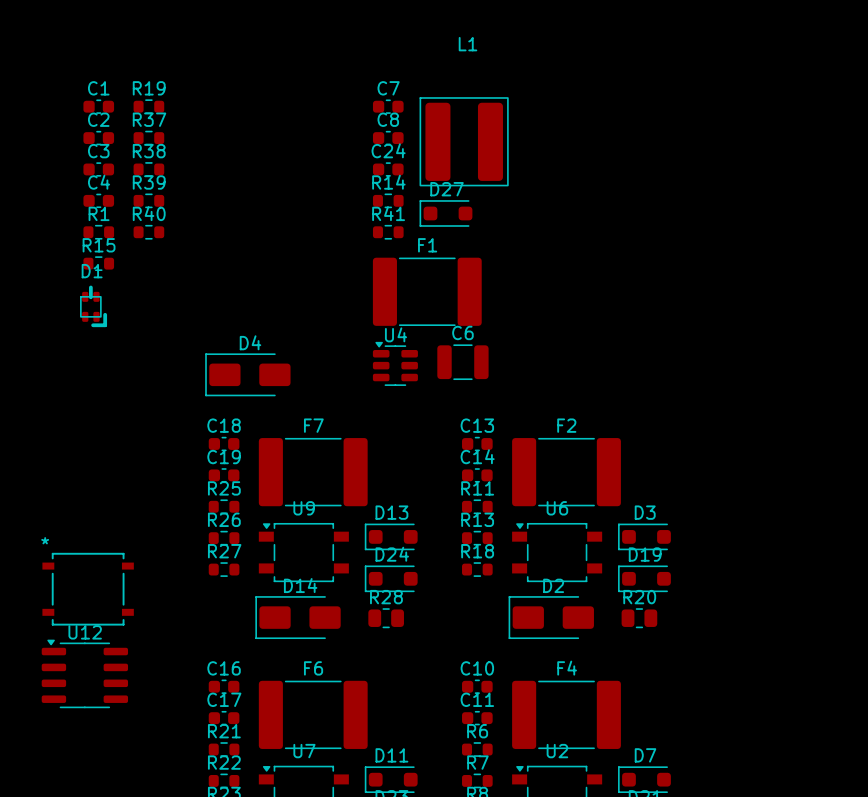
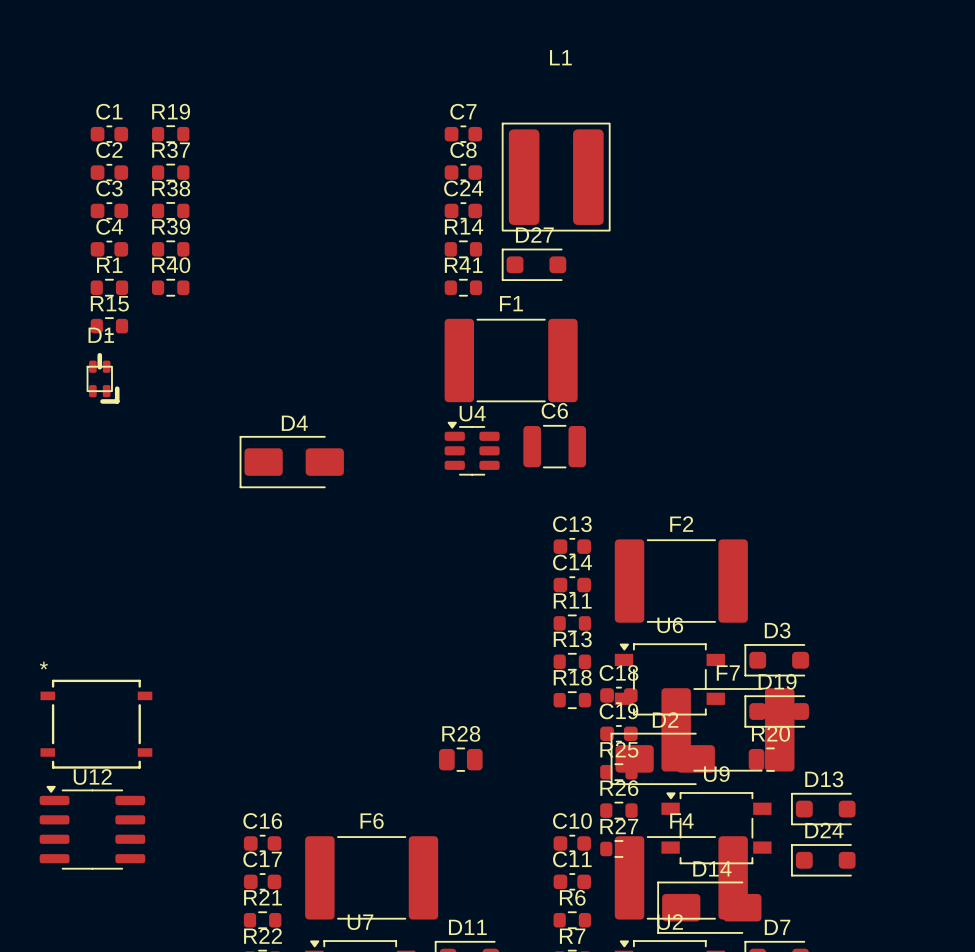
C18 position: (224, 443) -> (618, 695)
F7 position: (313, 472) -> (727, 729)
C19 position: (224, 475) -> (618, 733)
R25 position: (224, 506) -> (618, 772)
D13 position: (391, 536) -> (823, 809)
R26 position: (224, 538) -> (618, 810)
U9 position: (303, 552) -> (716, 828)
R27 position: (224, 569) -> (618, 848)
D24 position: (391, 578) -> (823, 860)
D14 position: (298, 617) -> (709, 907)

